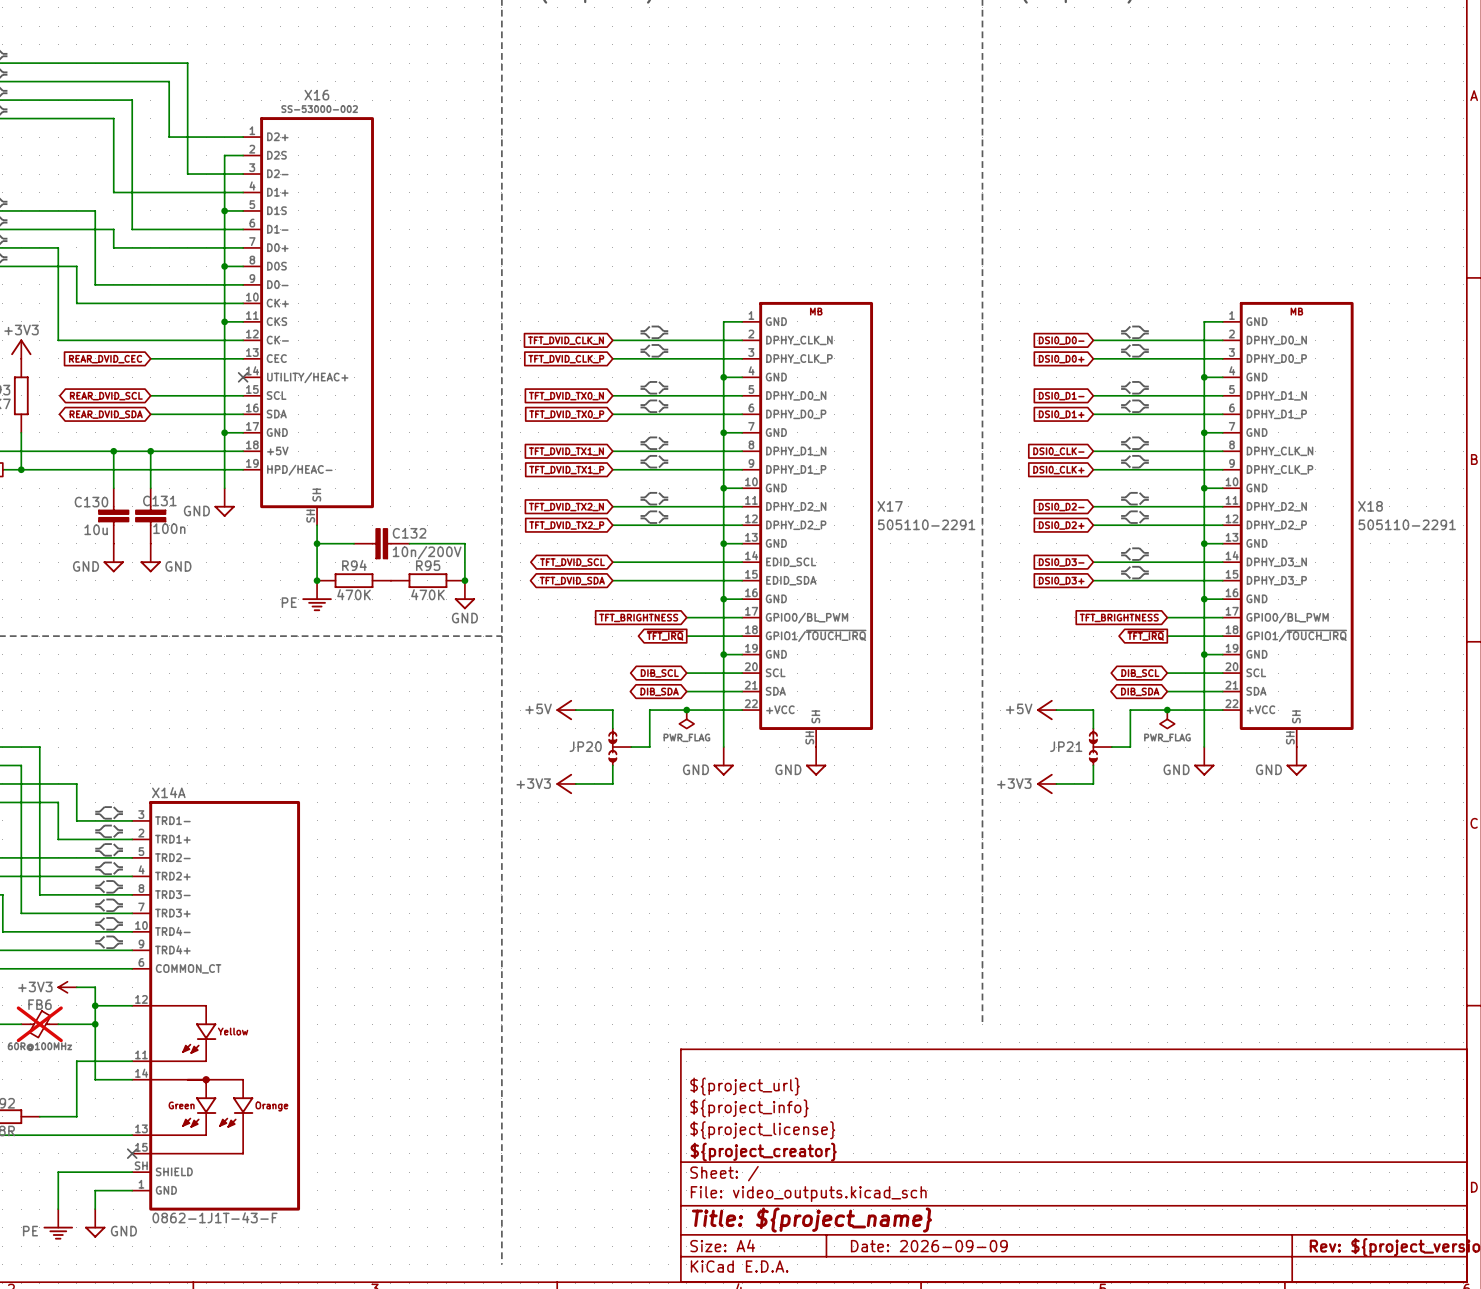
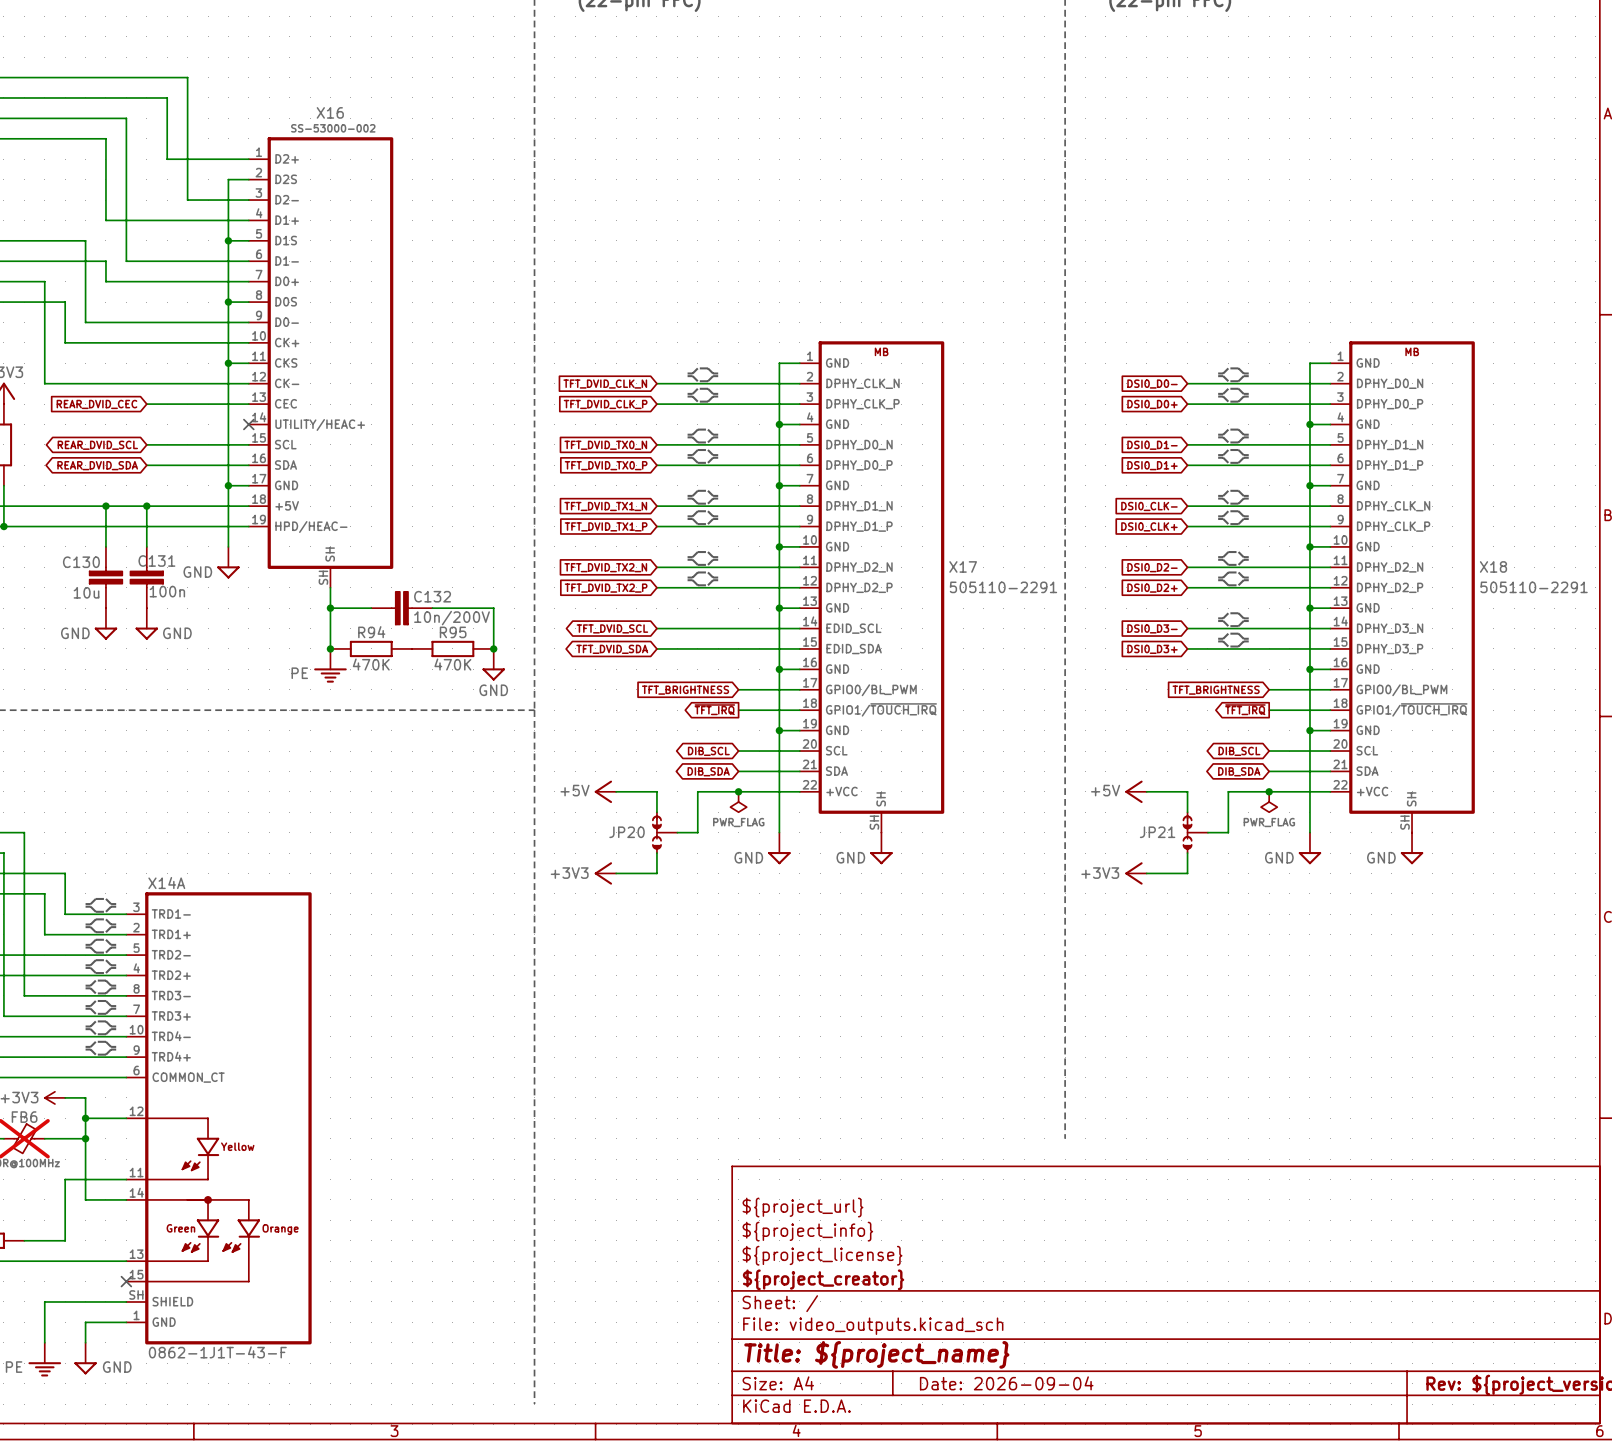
title block: Date: 2026-09-09 (929, 1246) -> Date: 2026-09-04 (1006, 1383)

